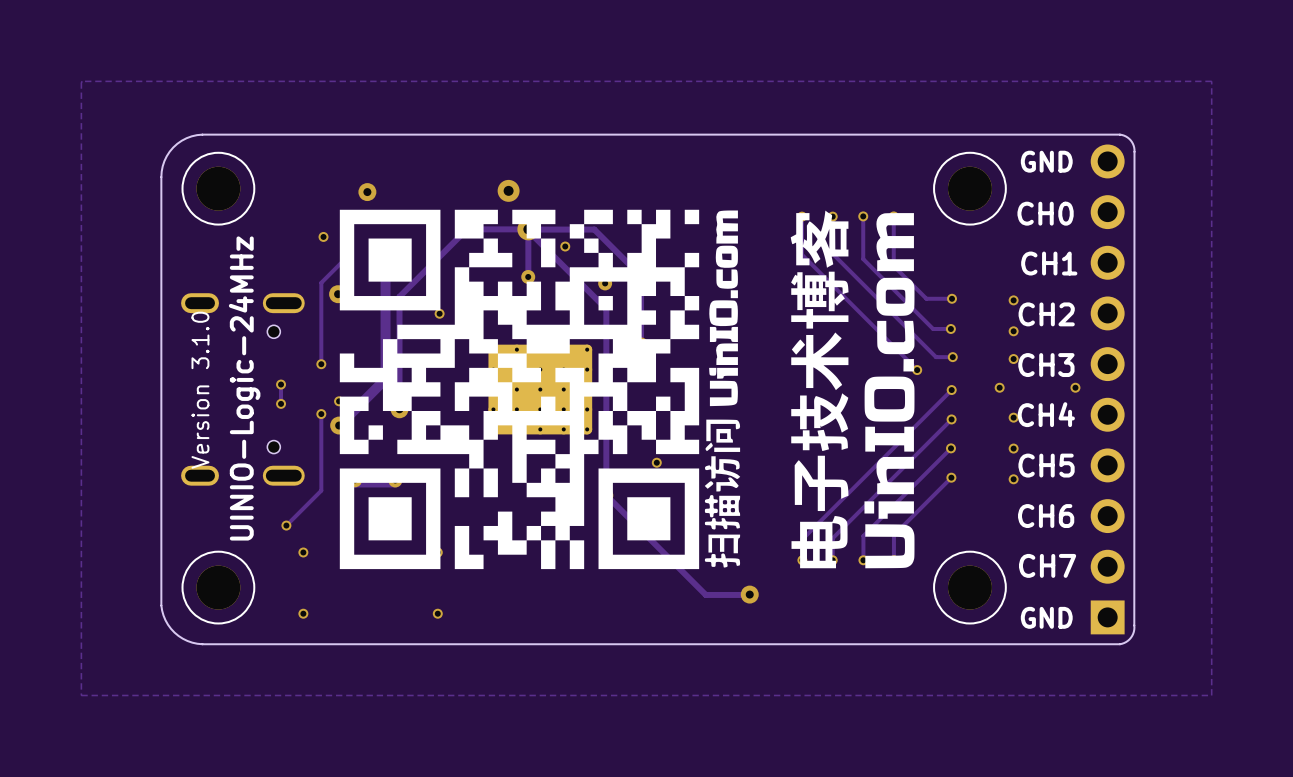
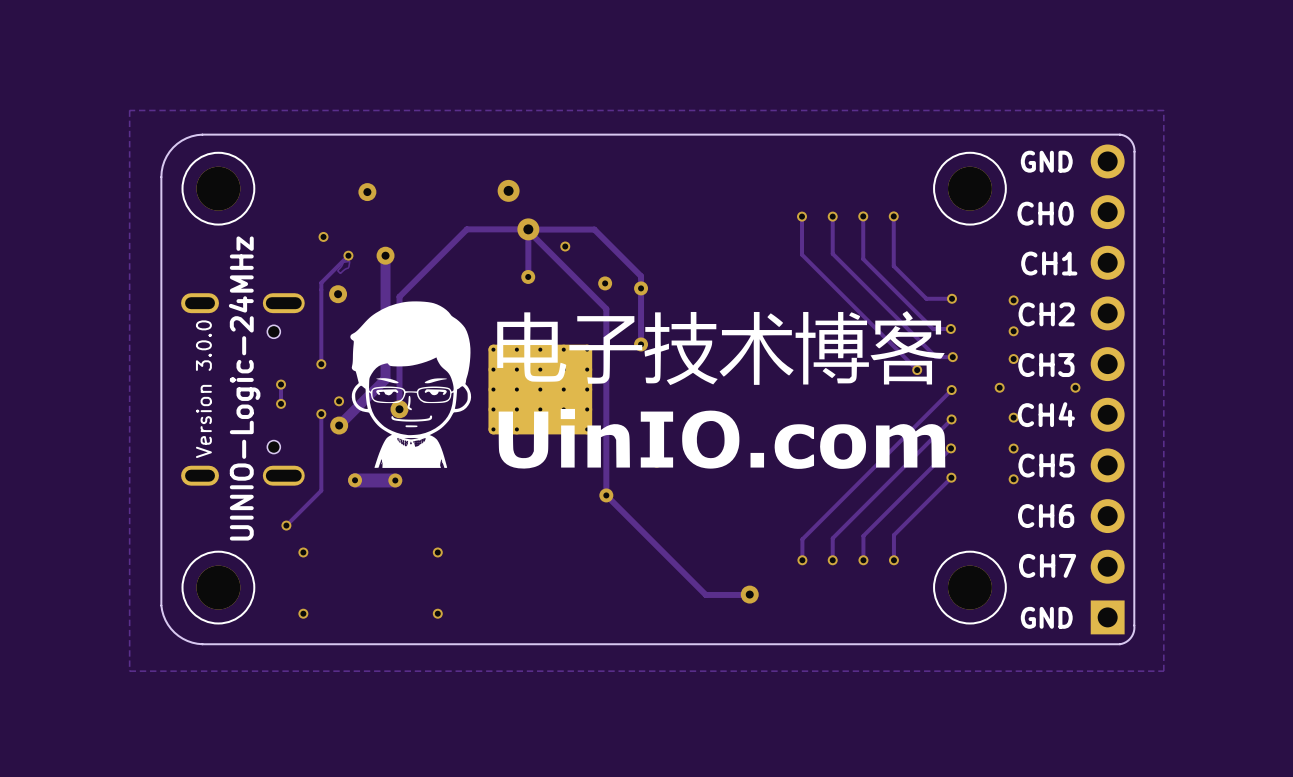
zone outline: (1211, 81) (82, 81) (81, 695) (1211, 695) (1211, 81) -> (1163, 110) (1163, 671) (129, 671) (129, 110) (1163, 110)
drawing: [339, 209, 741, 570] -> none
drawing: [790, 210, 915, 569] -> none
zone outline: none -> (349, 261) (343, 262) (337, 270) (340, 273) (348, 268) (349, 261)
drawing: none -> [350, 301, 946, 469]
text: Version 3.1.0 (200, 390) -> Version 3.0.0 (203, 389)

